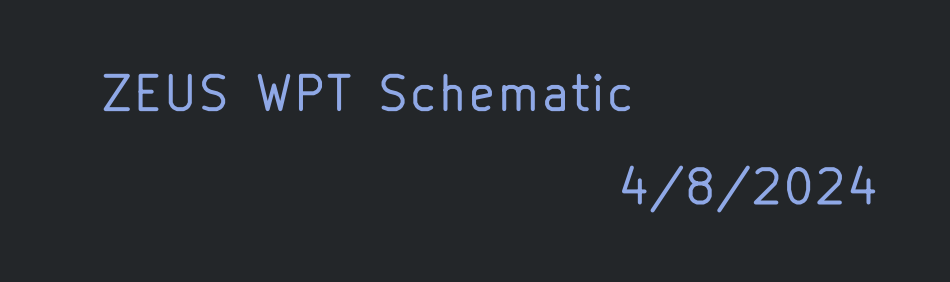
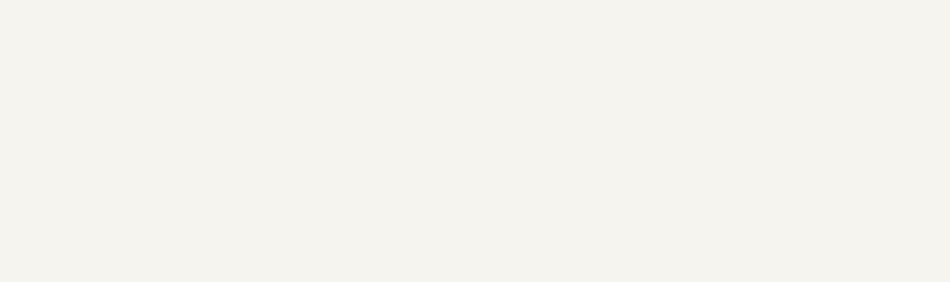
text: ZEUS WPT Schematic (366, 92) -> none
text: 4/8/2024 (748, 189) -> none

